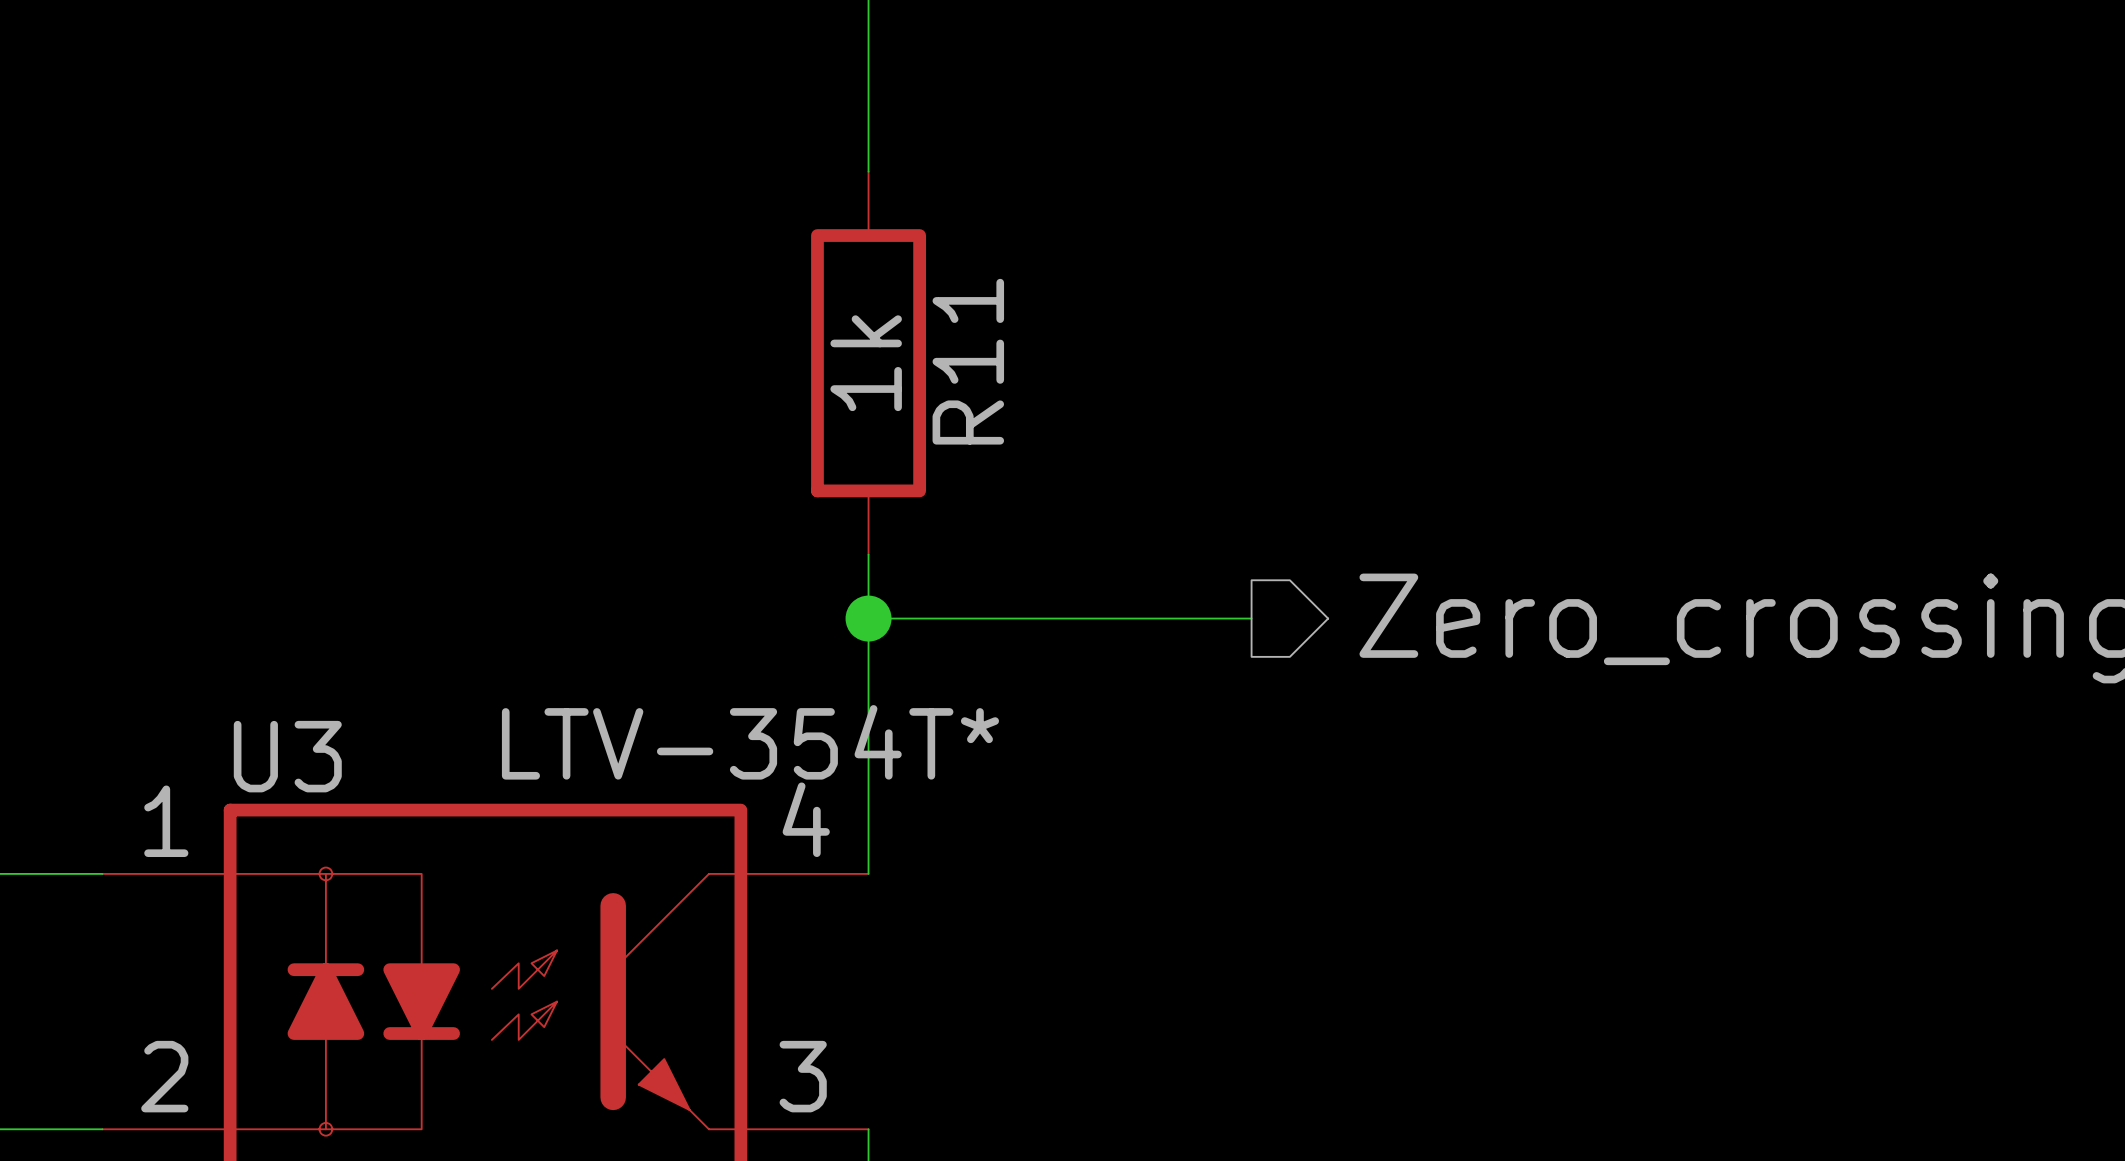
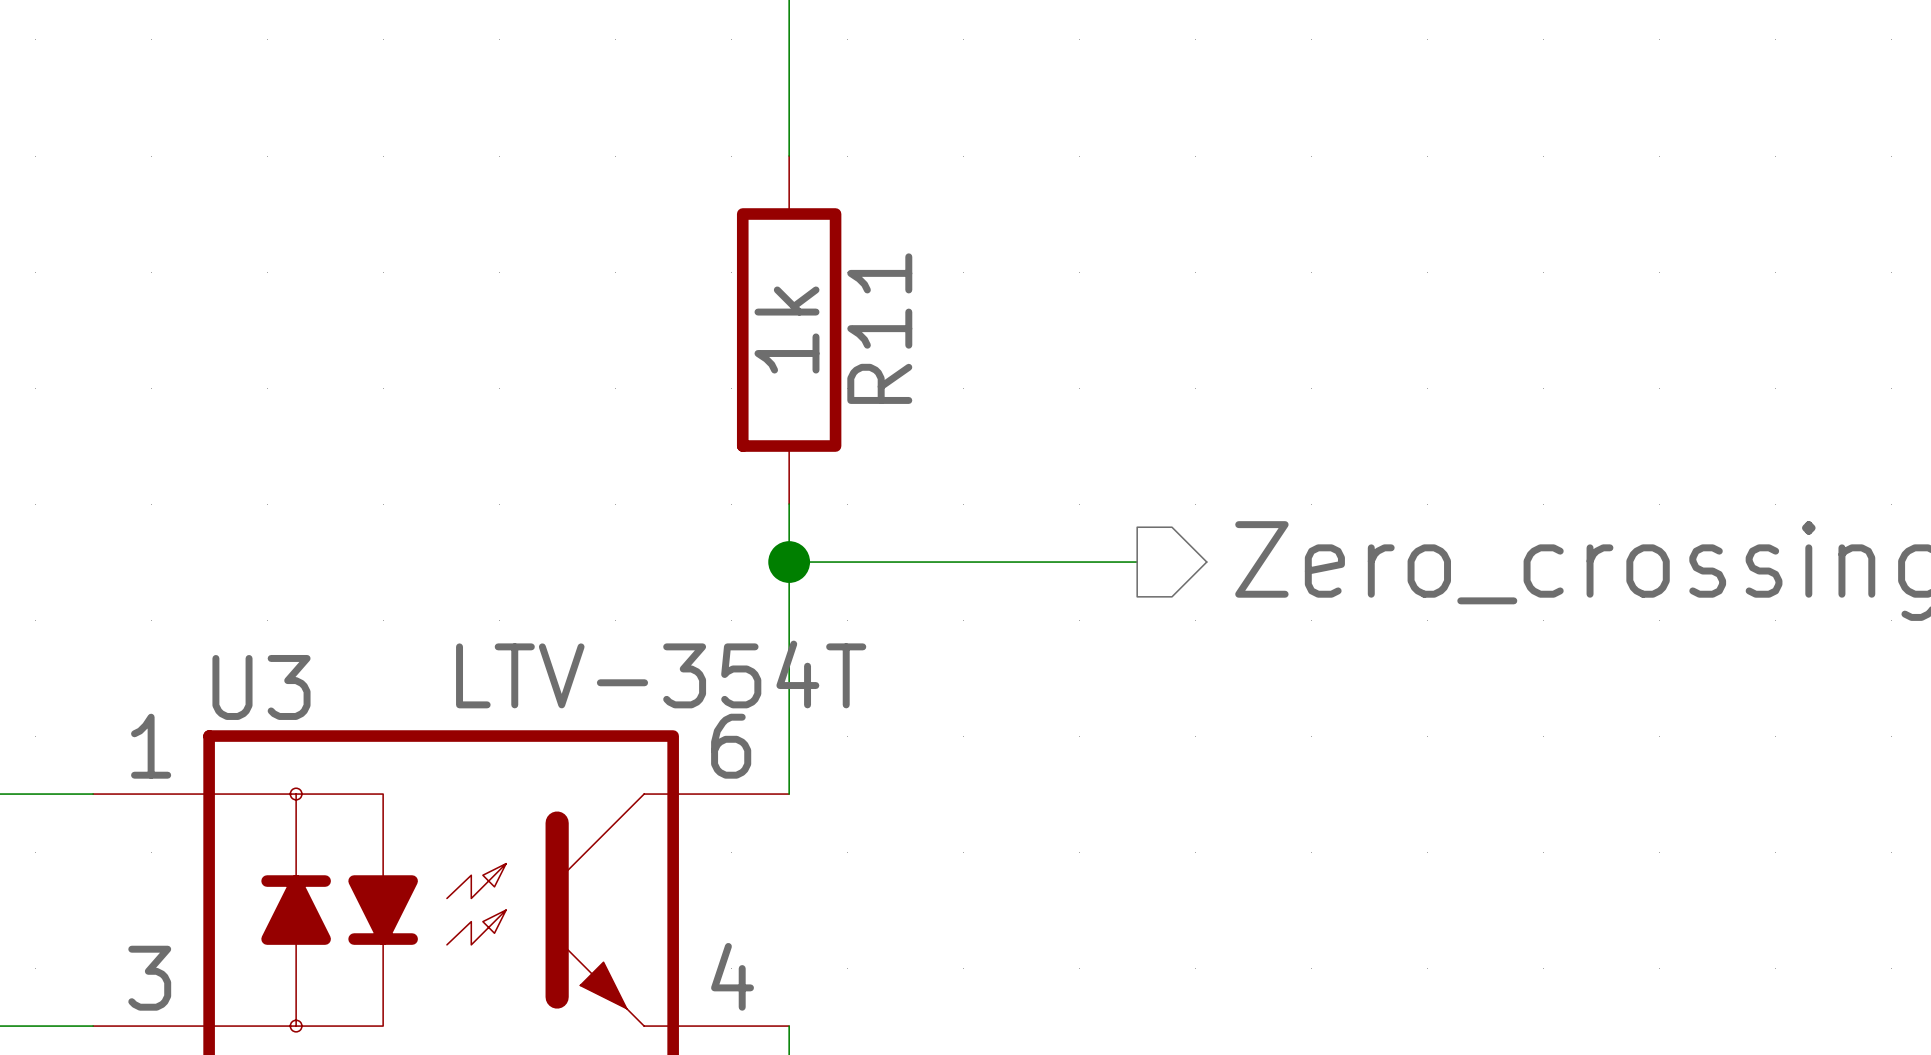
U3 value: LTV-354T* (750, 742) -> LTV-354T (661, 674)
U3 pin number: 4 (806, 819) -> 6 (731, 746)
U3 pin number: 2 (164, 1076) -> 3 (149, 978)
U3 pin number: 3 (803, 1076) -> 4 (732, 976)

